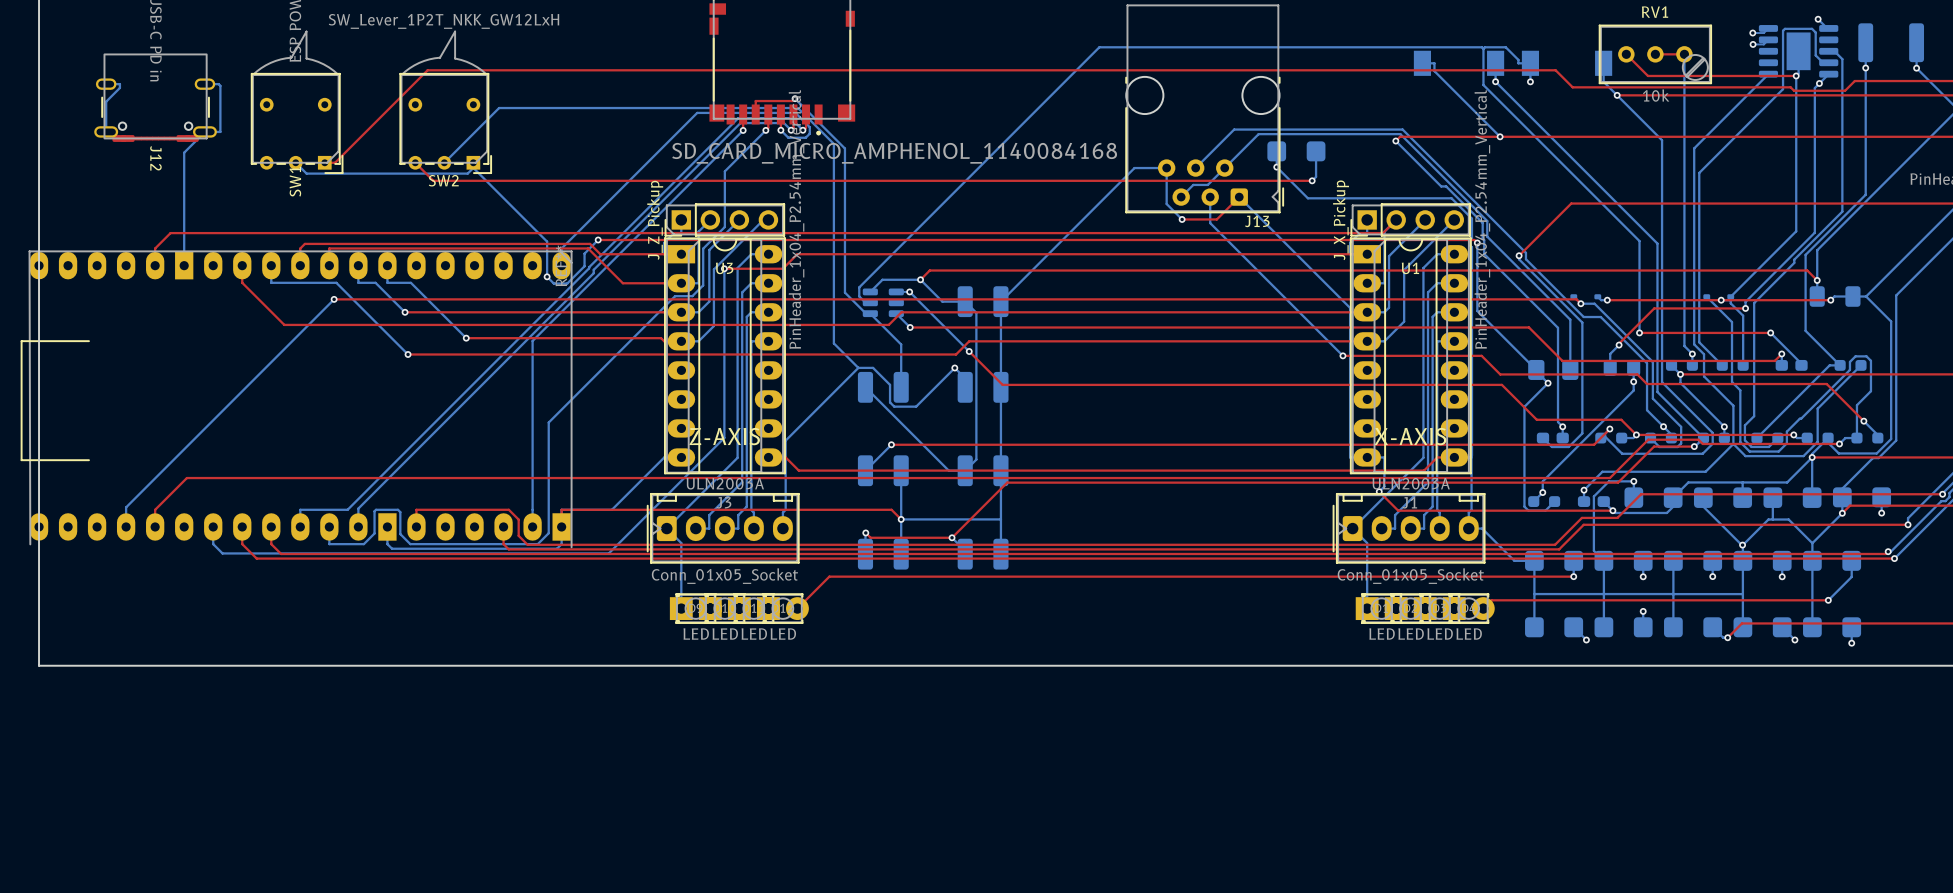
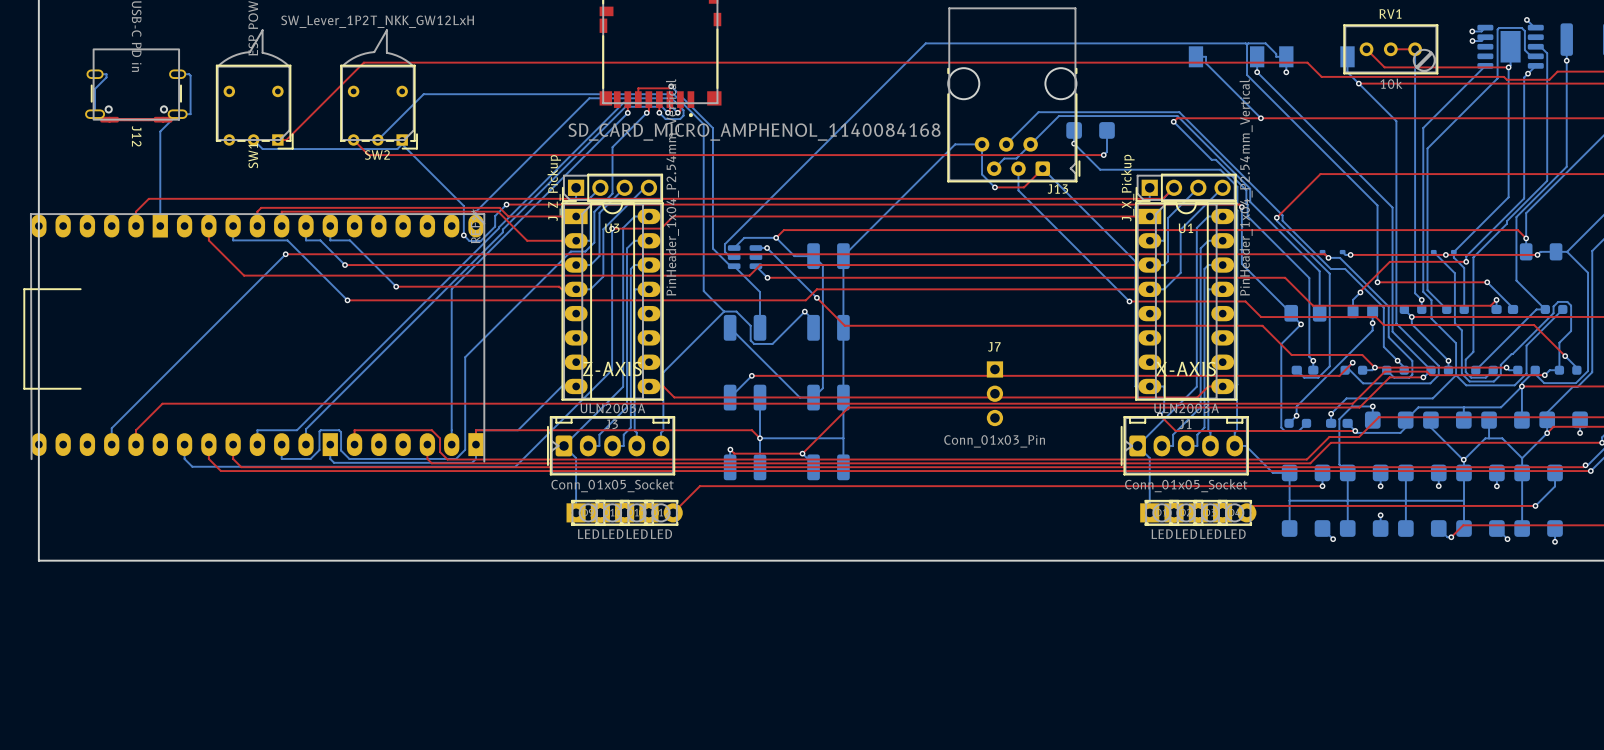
J7: none -> Conn_01x03_Pin (994, 393)

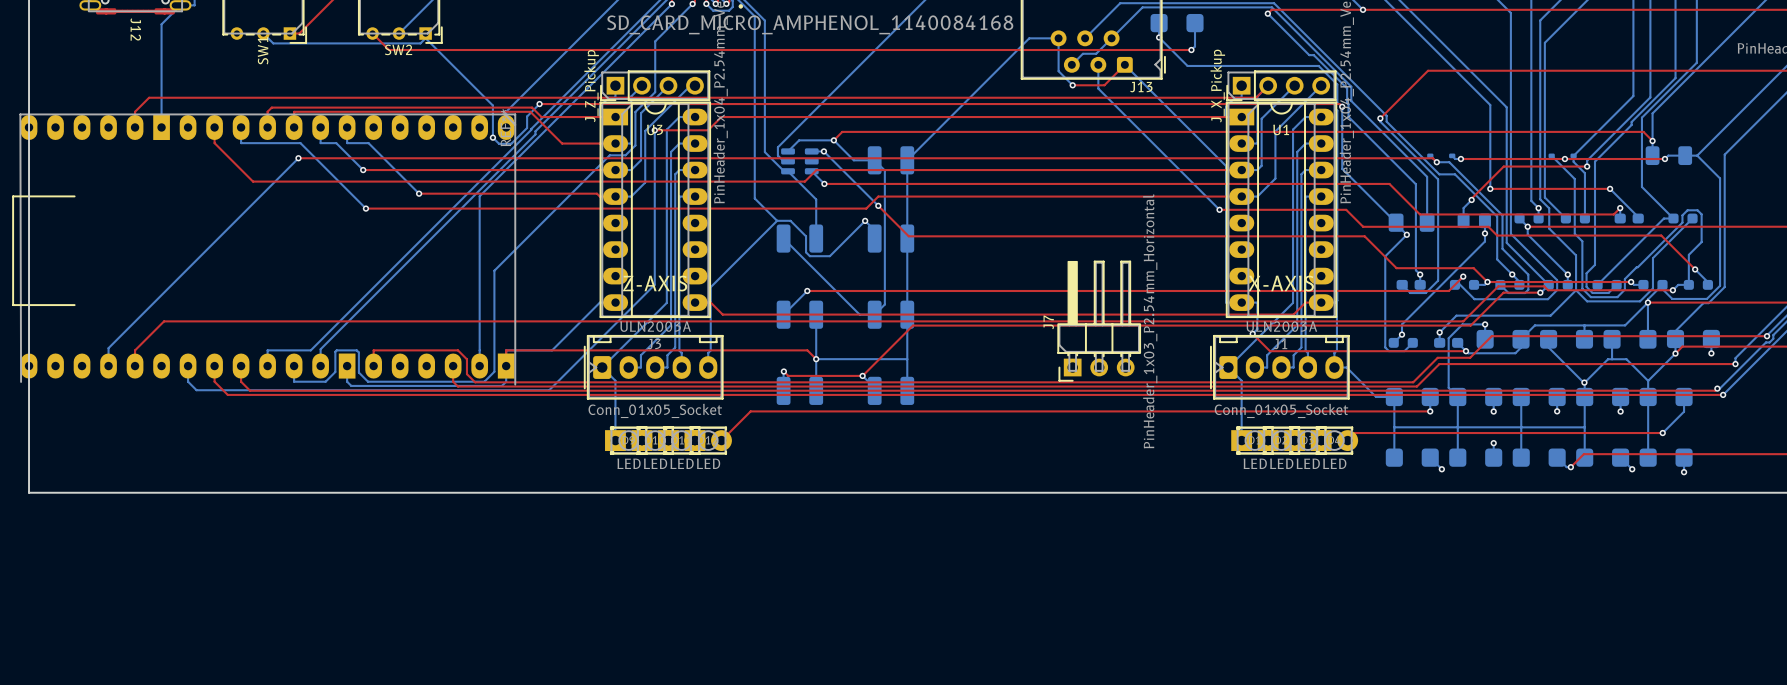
J7 name position: J7 (994, 346) -> J7 (1048, 322)
J7 footprint: [986, 361, 1004, 427] -> [1057, 260, 1141, 382]
J7 value: Conn_01x03_Pin (994, 441) -> PinHeader_1x03_P2.54mm_Horizontal (1150, 321)

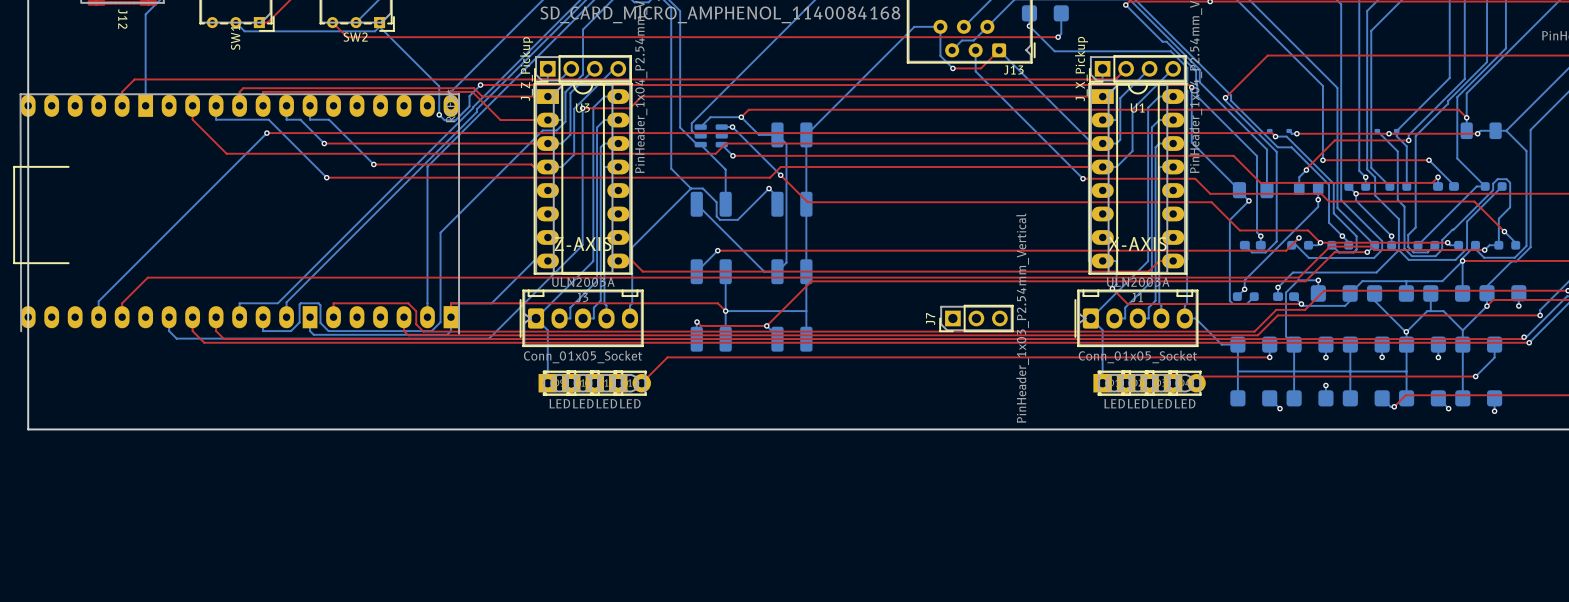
J7 footprint: [1057, 260, 1141, 382] -> [939, 305, 1014, 332]
J7 value: PinHeader_1x03_P2.54mm_Horizontal (1150, 321) -> PinHeader_1x03_P2.54mm_Vertical (1022, 318)

